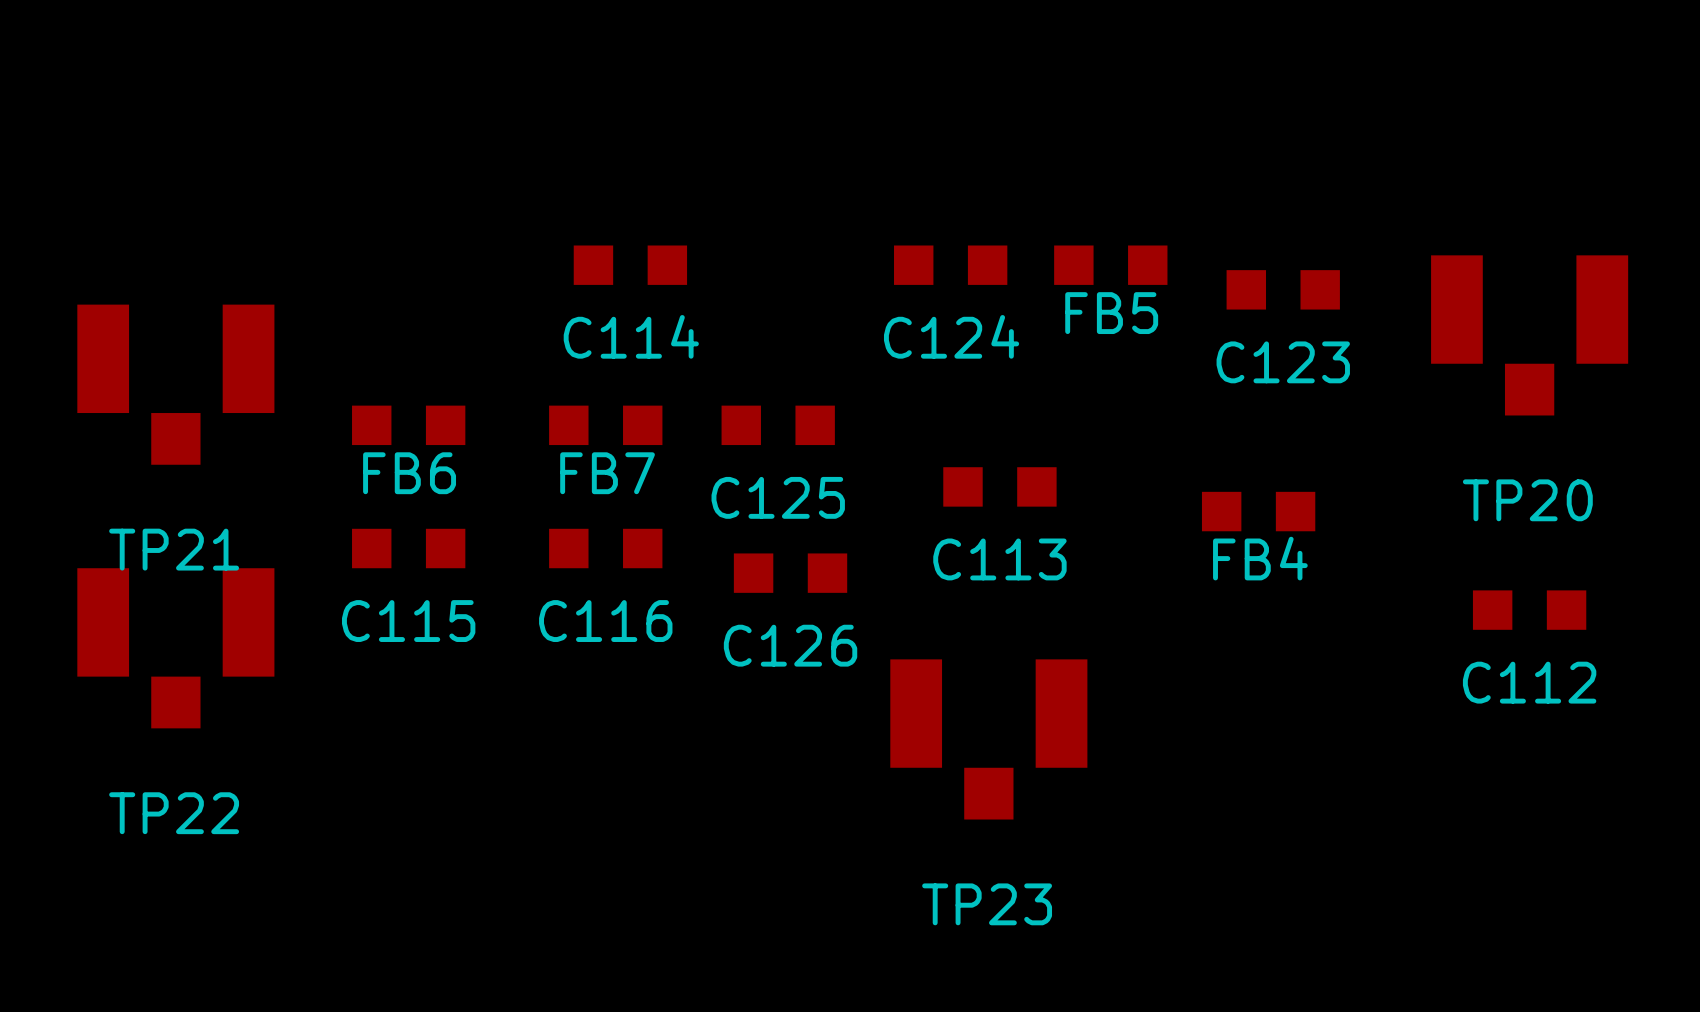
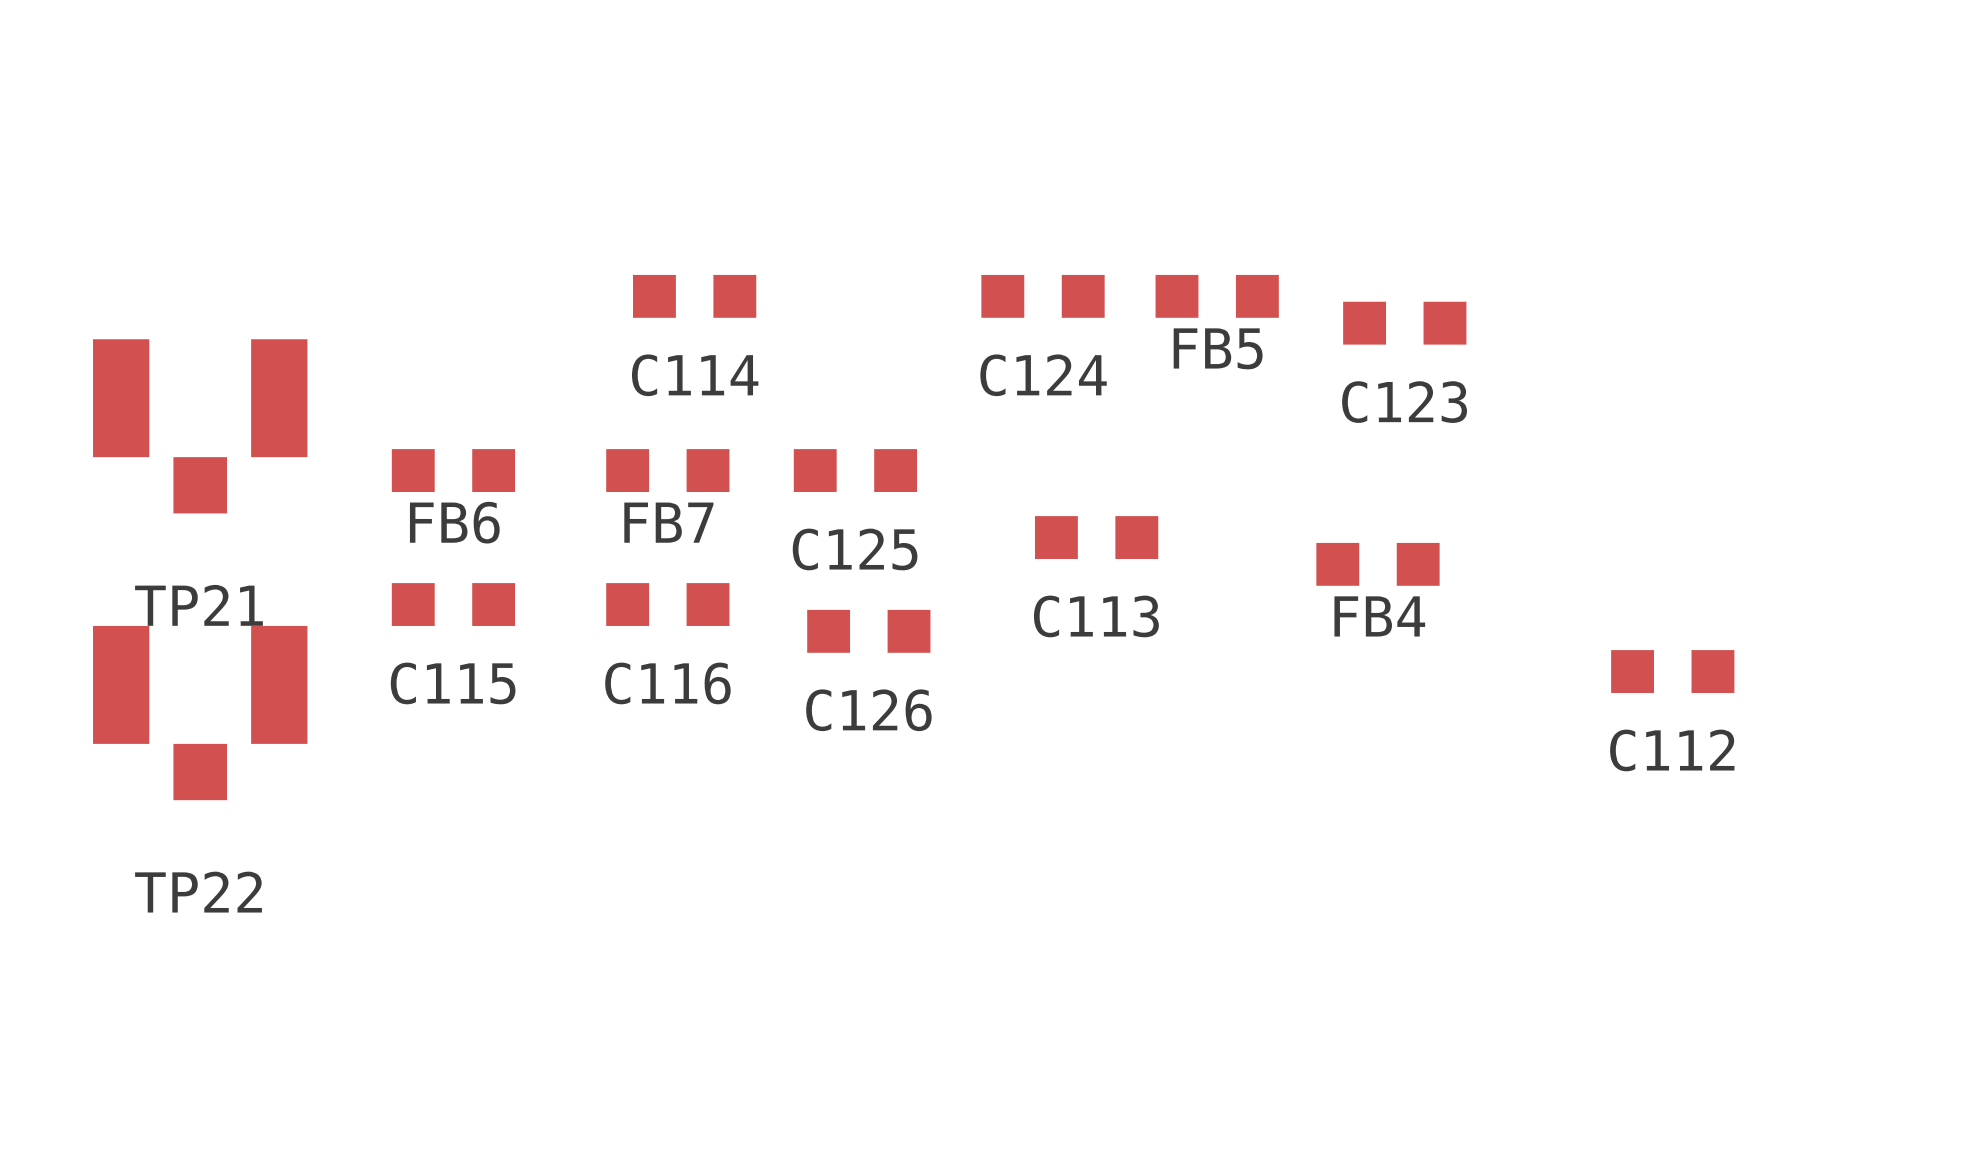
TP20: (1529, 335) -> none
TP23: (988, 739) -> none

